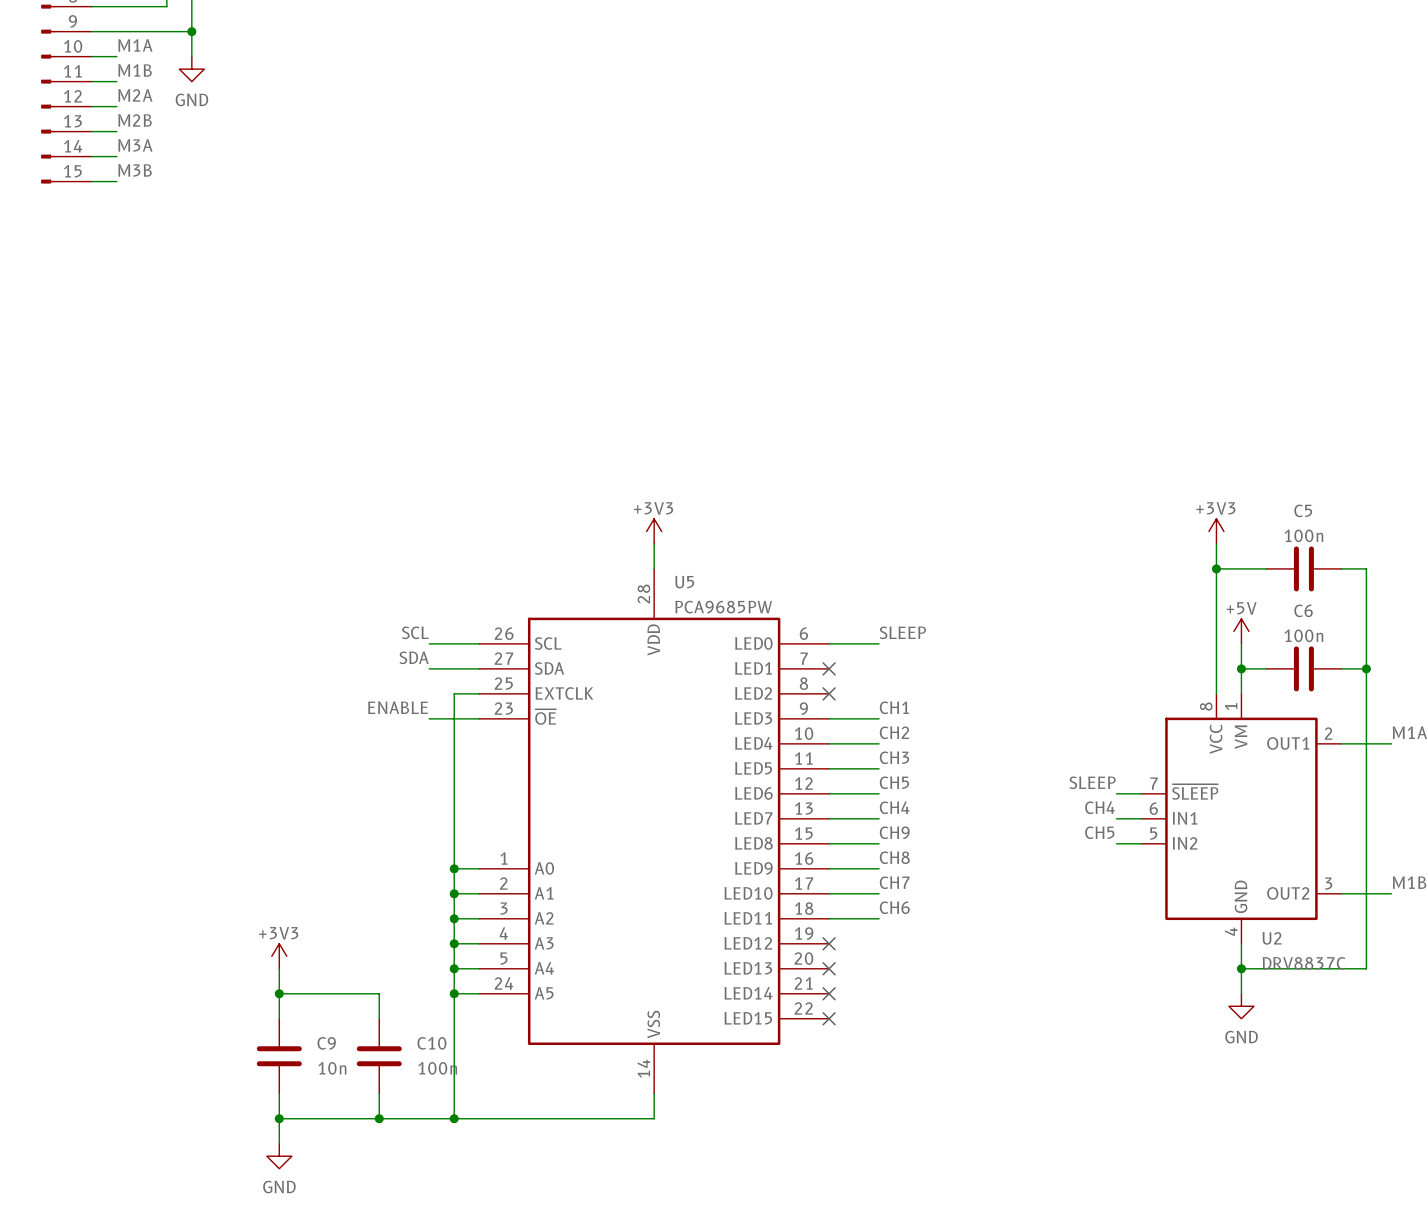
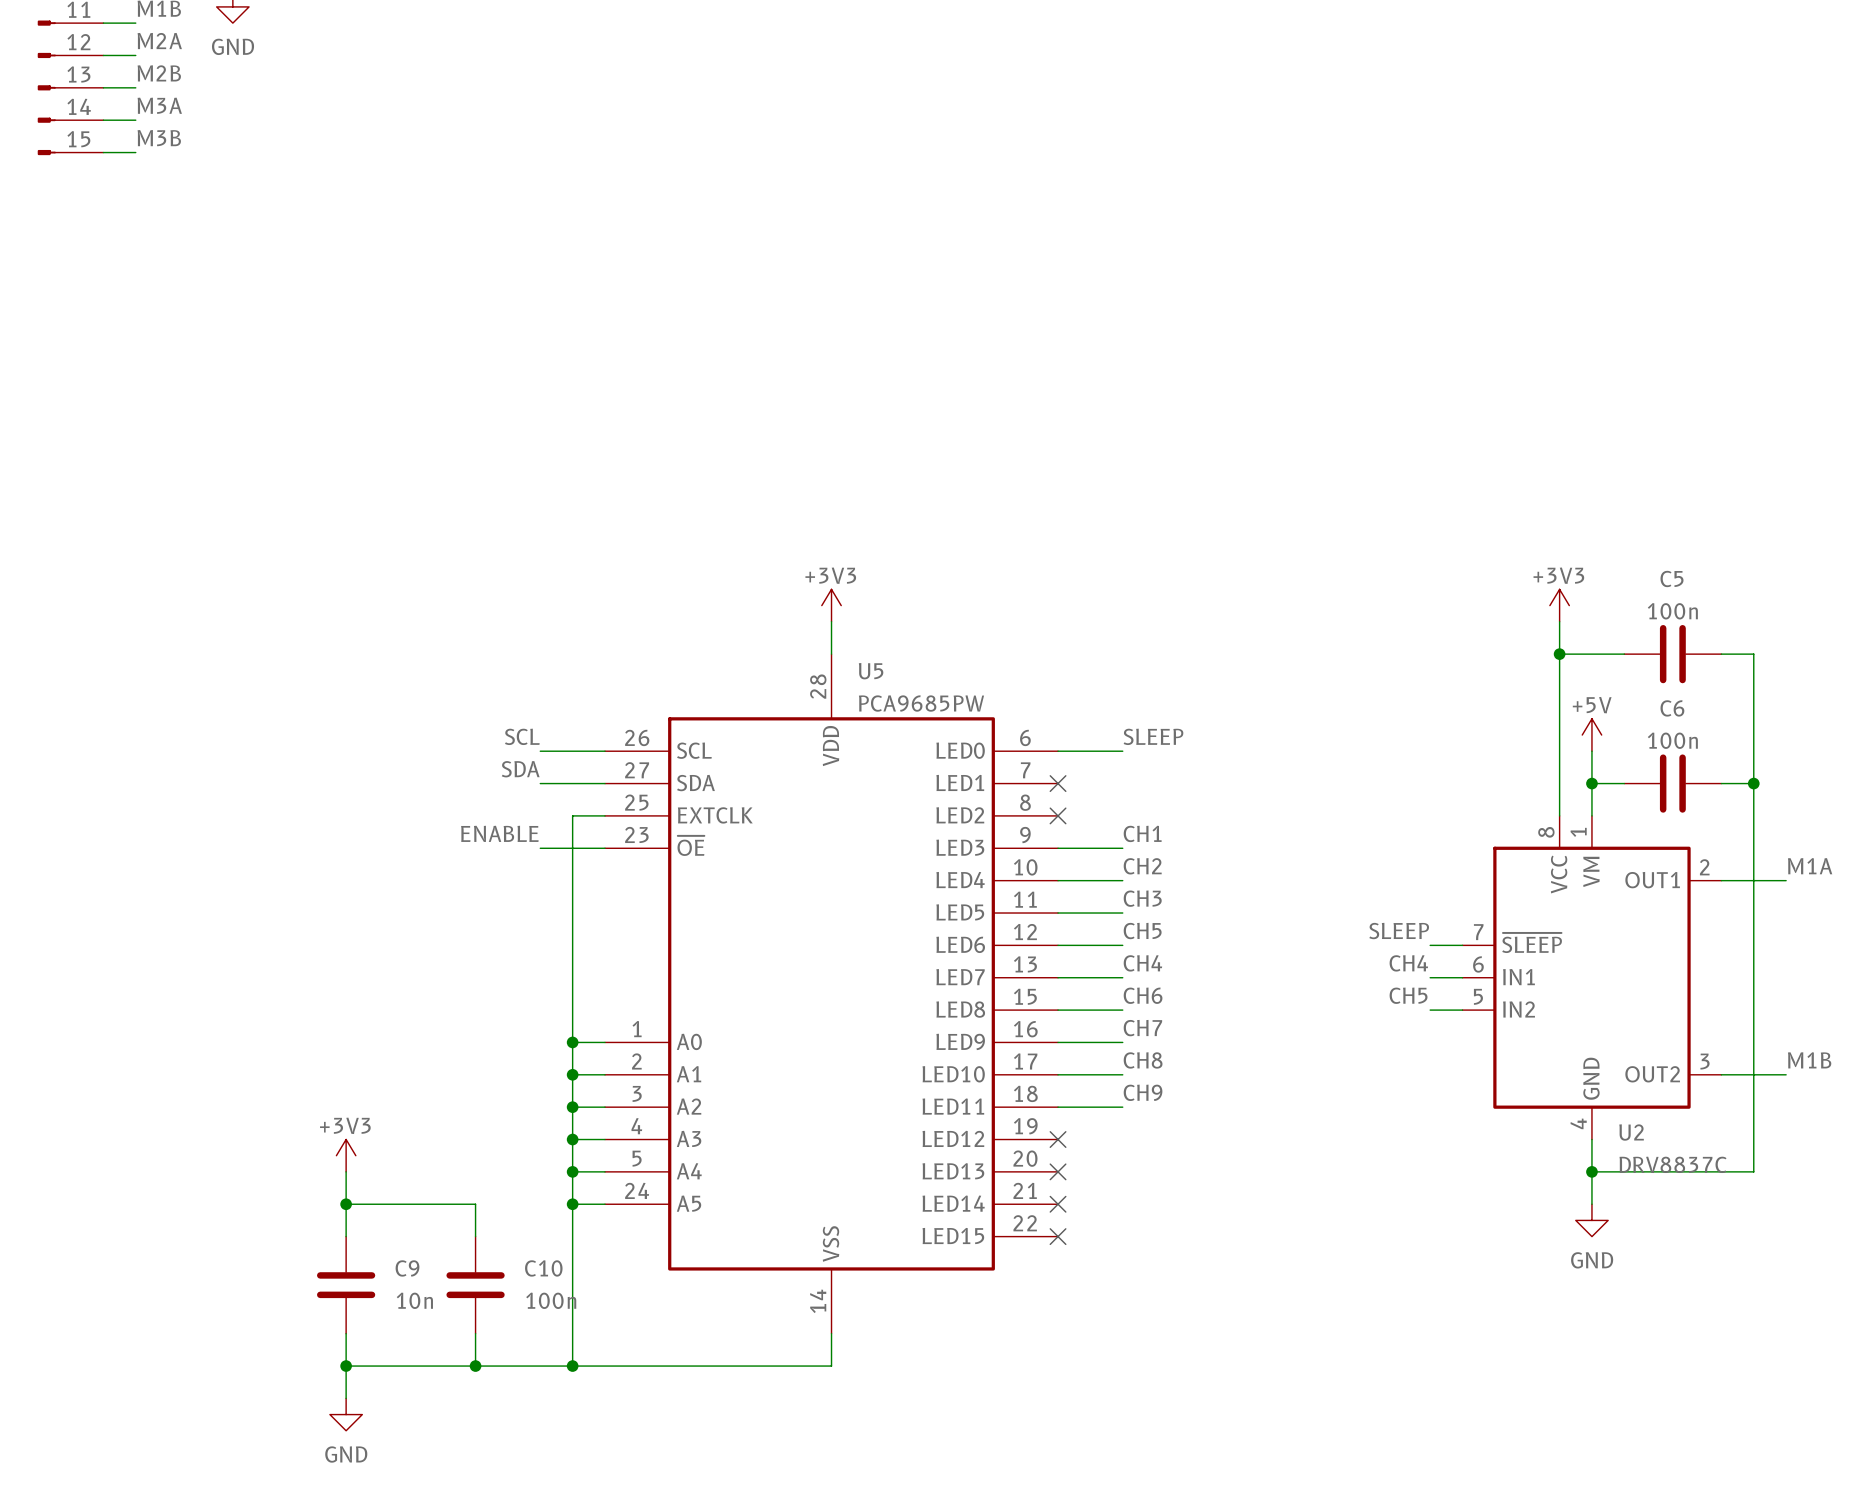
label: CH9 (894, 832) -> CH6 (1143, 995)
label: CH8 (894, 857) -> CH7 (1142, 1028)
label: CH7 (894, 882) -> CH8 (1143, 1060)
label: CH6 (894, 907) -> CH9 (1143, 1092)

